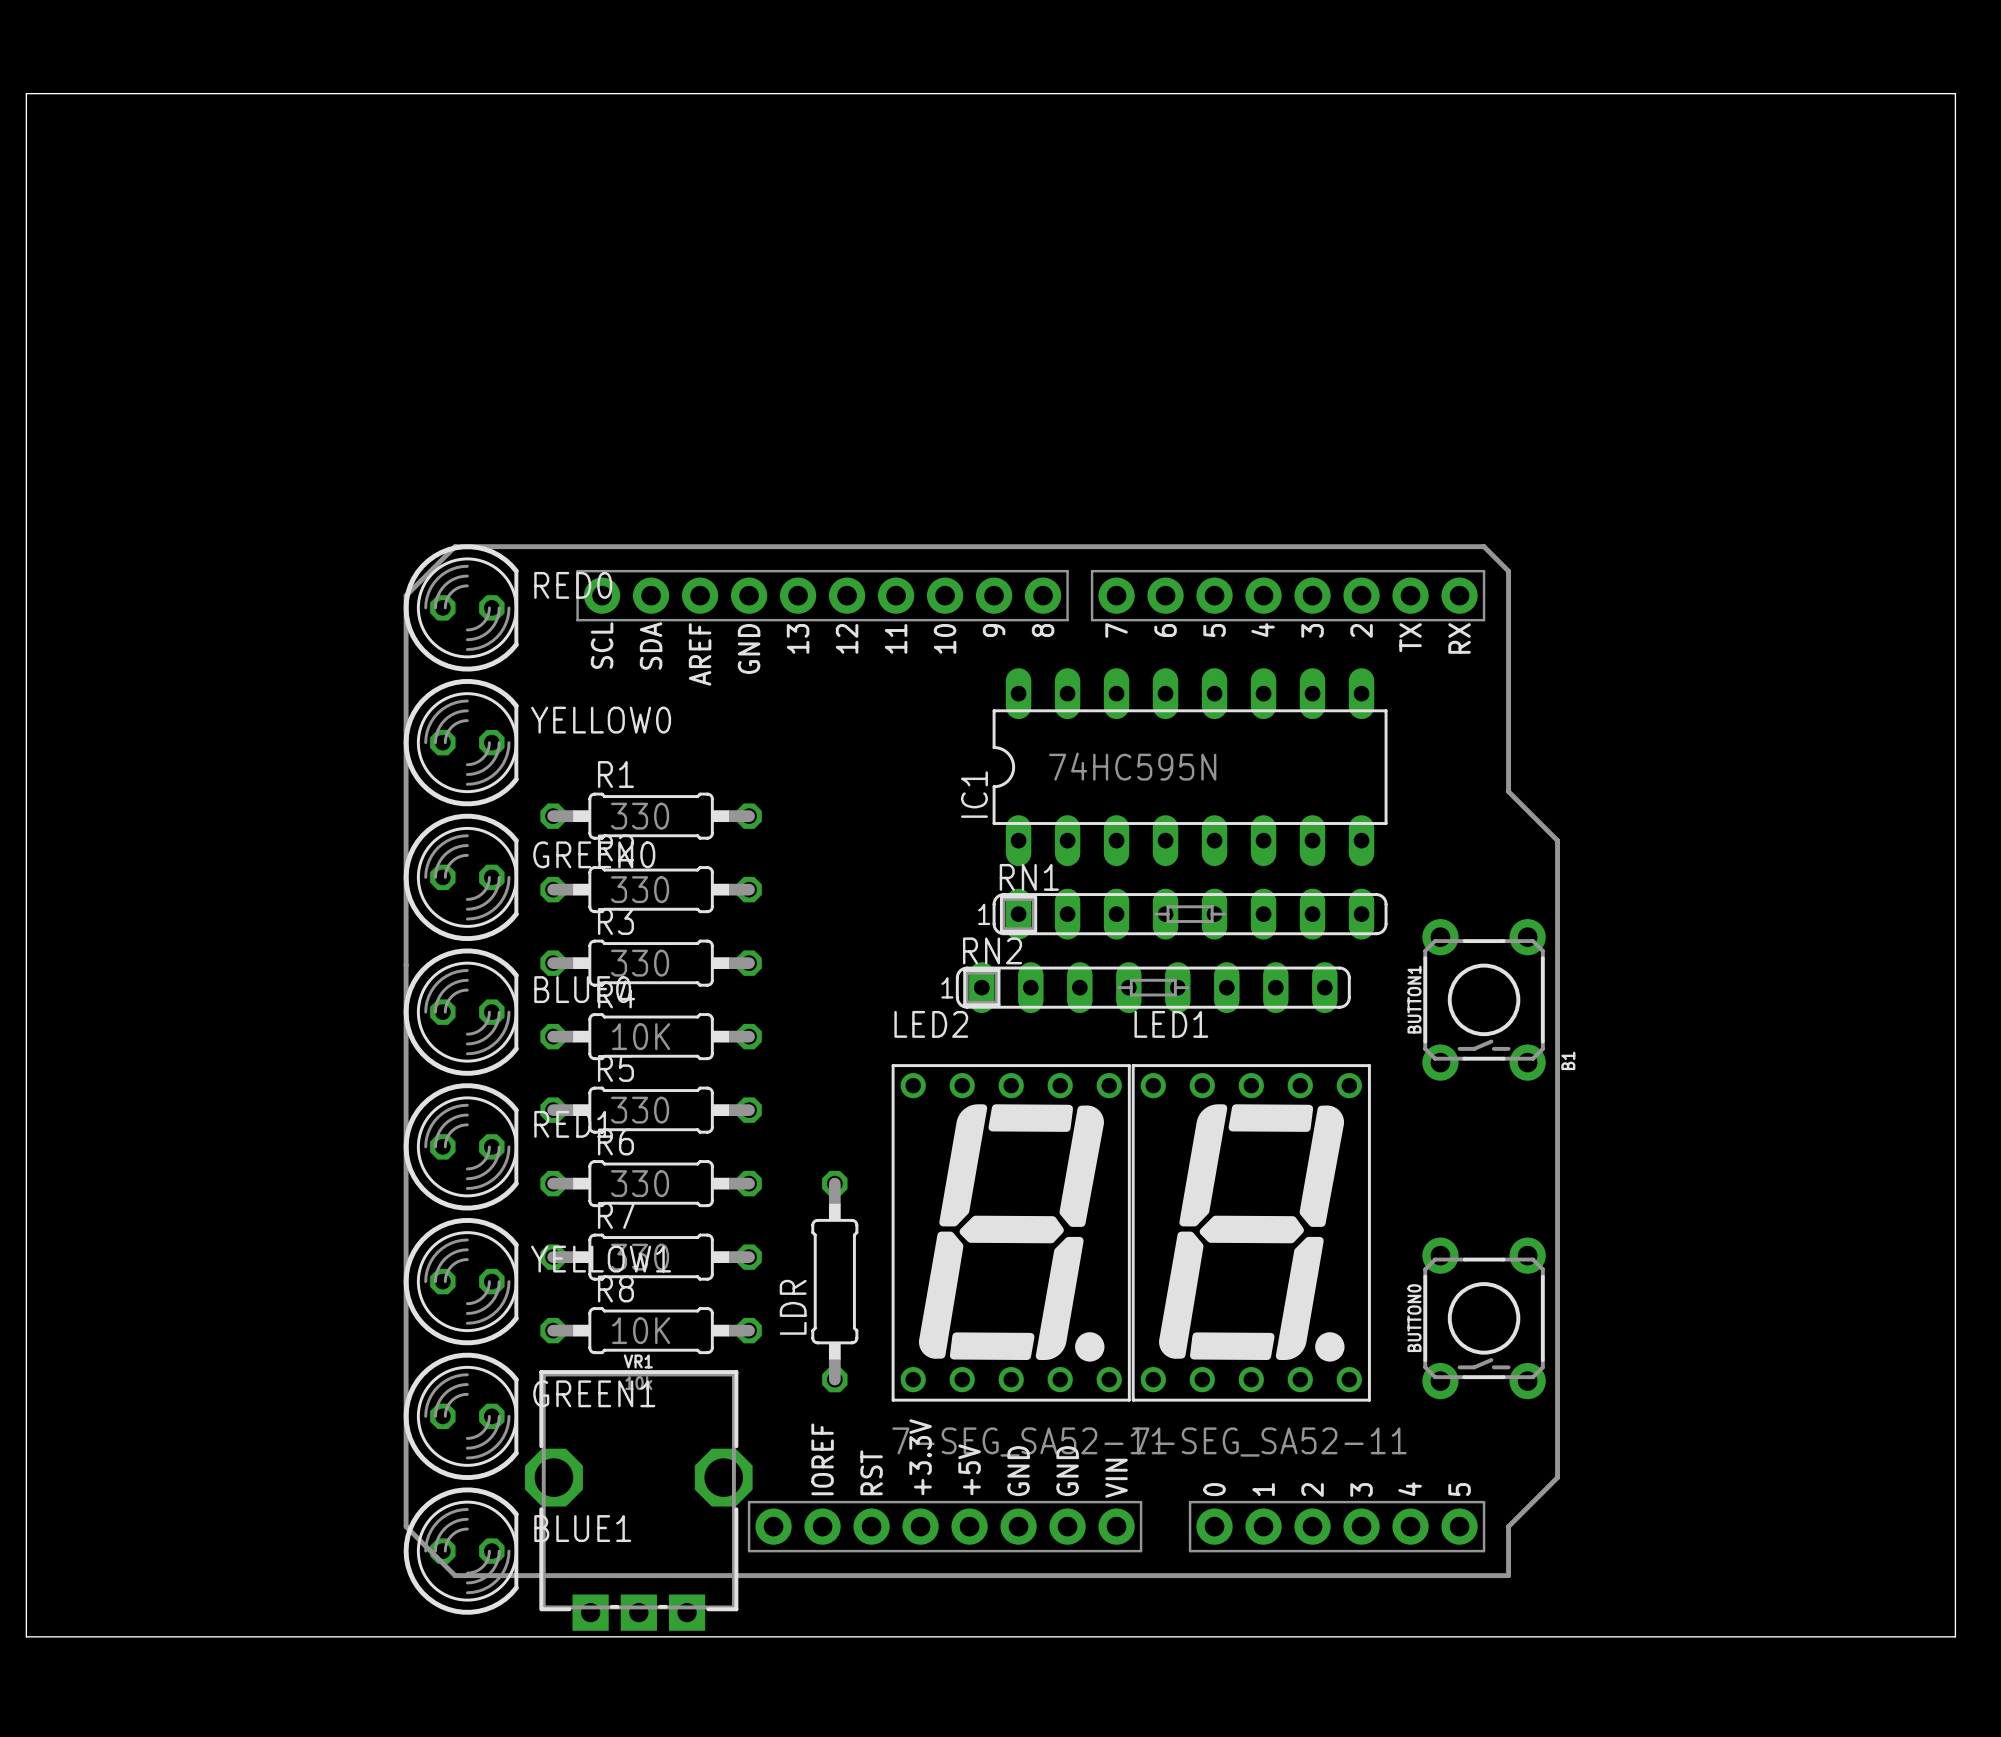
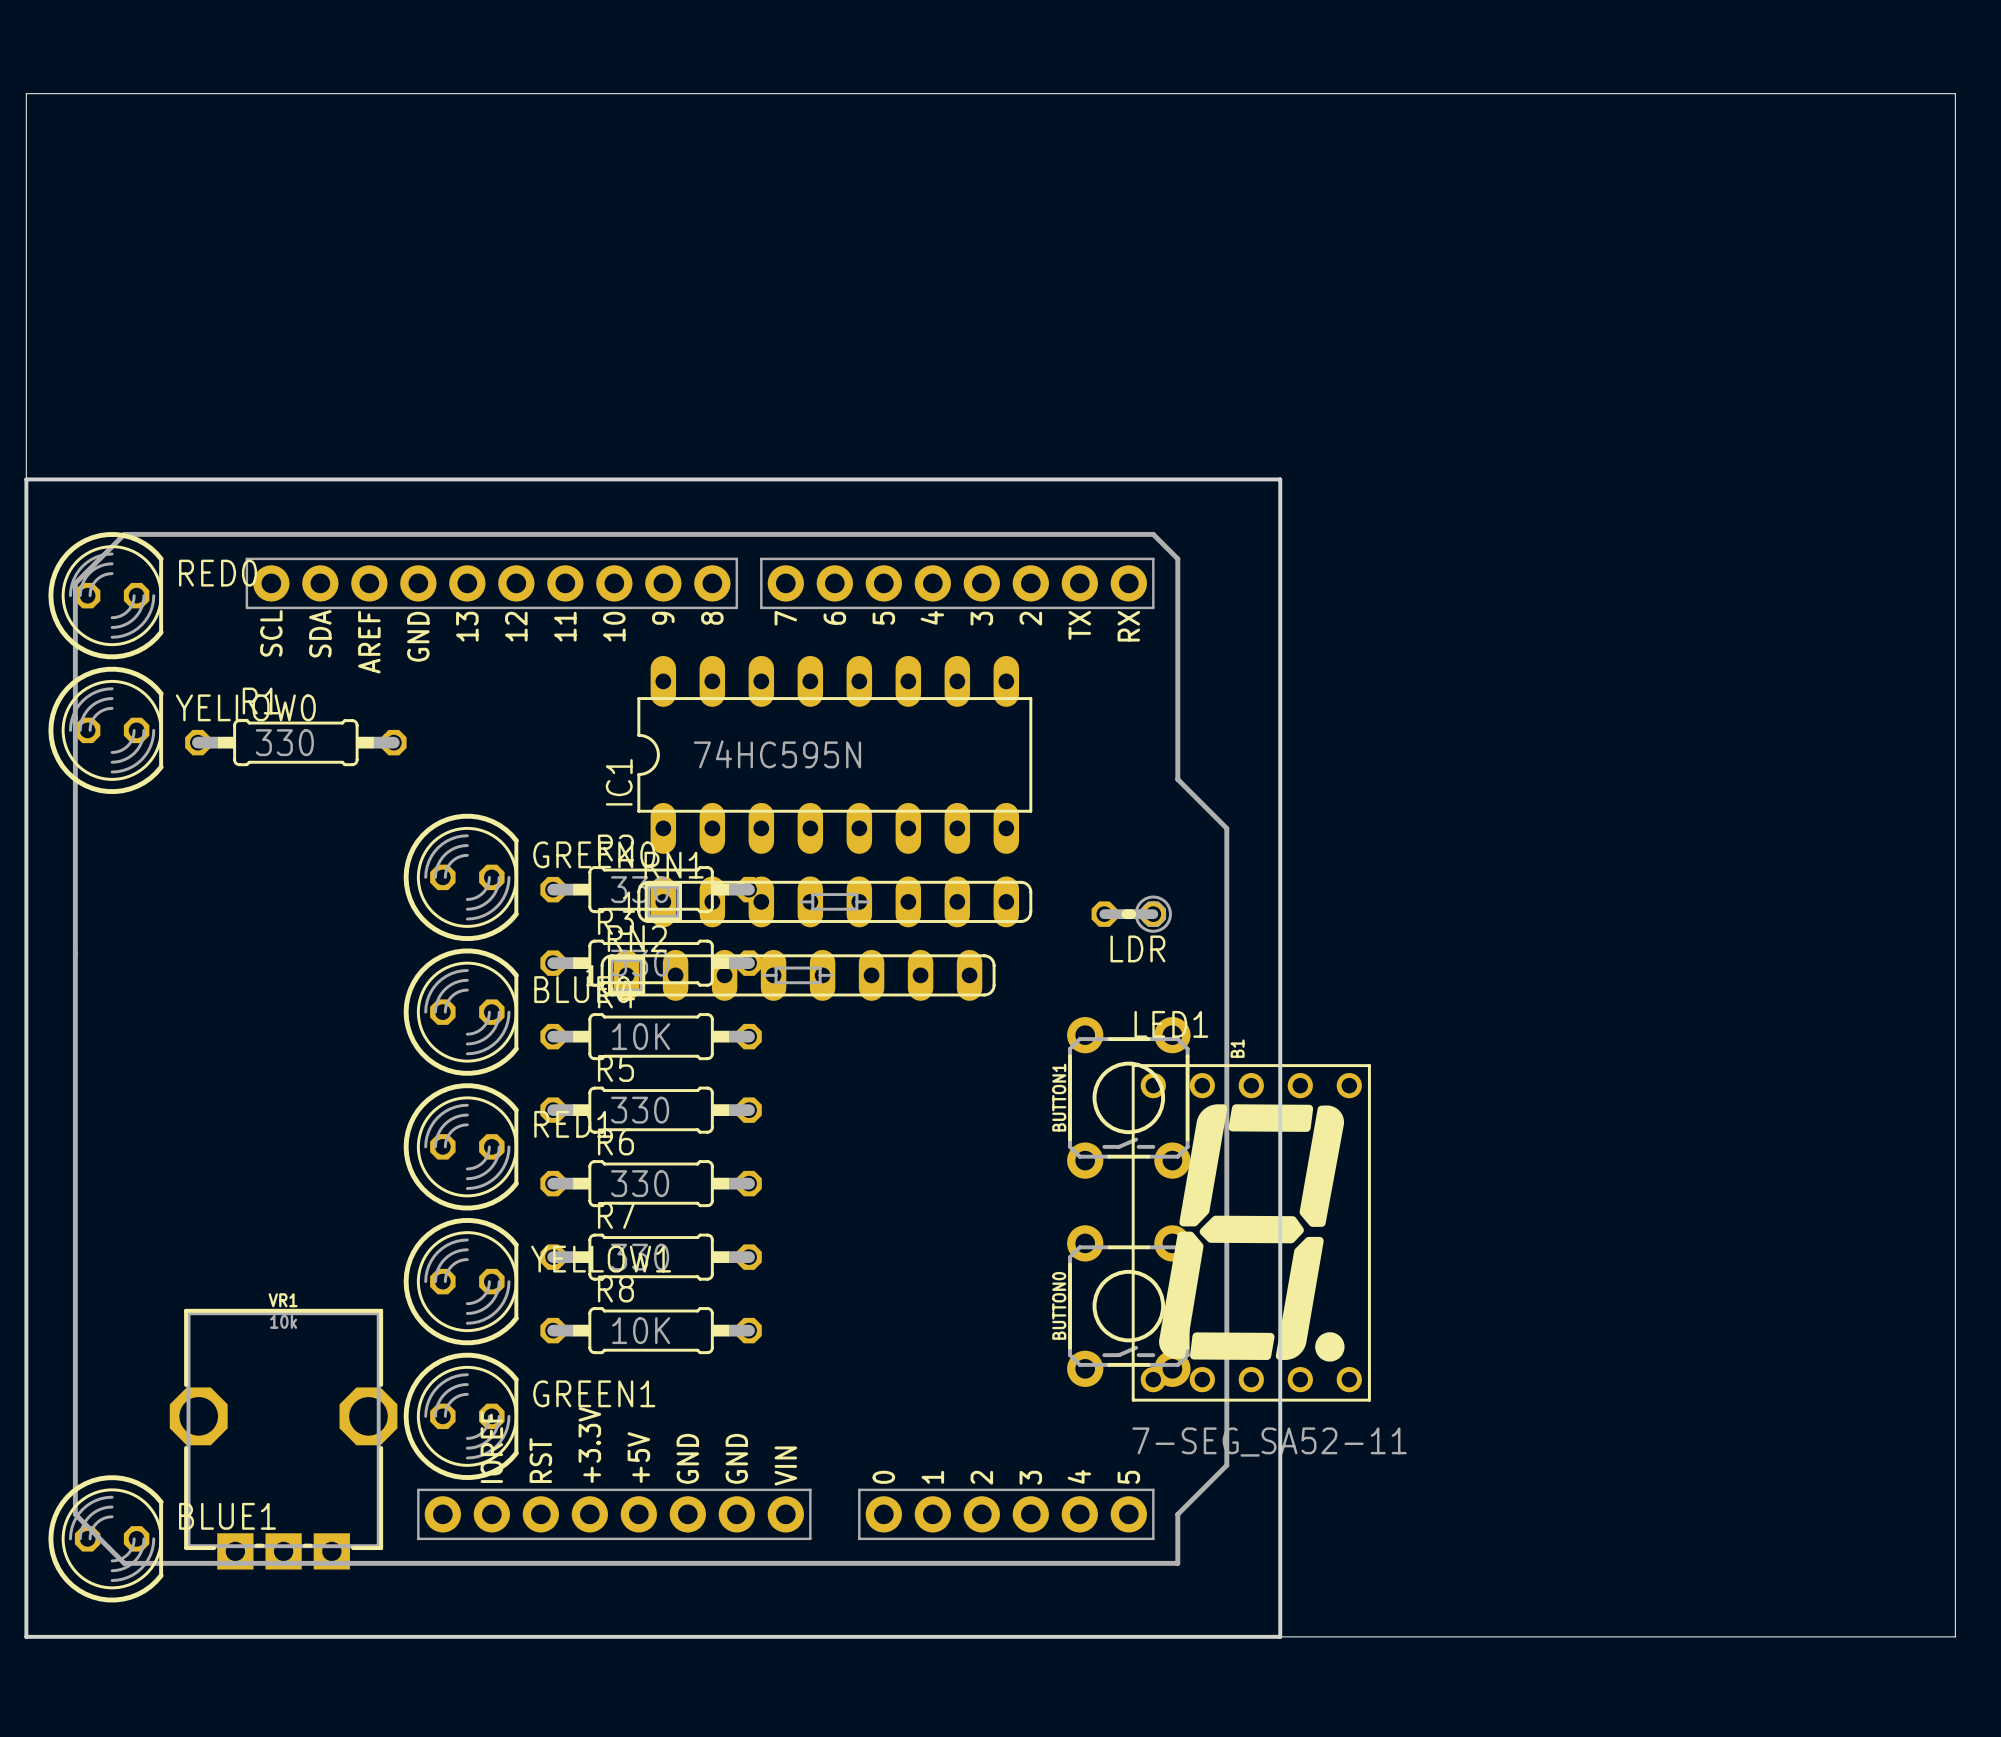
board edge: none -> (26, 479) (26, 1636) (1280, 1636) (1280, 479) (26, 479)
RED0 position: (461, 607) -> (105, 595)
YELLOW0 position: (461, 742) -> (105, 730)
IC1 position: (1190, 767) -> (834, 754)
R1 position: (651, 816) -> (295, 742)
LDR: none -> (1131, 914)
RN1 position: (1190, 914) -> (834, 901)
RN2 position: (1153, 987) -> (798, 975)
BUTTON1 position: (1484, 999) -> (1128, 1097)
B1 position: (981, 1061) -> (651, 1048)
LED2: 7-SEG_SA52-11 (1011, 1232) -> none
LDR: (834, 1281) -> none
BUTTON0 position: (1484, 1318) -> (1128, 1306)
VR1 position: (638, 1500) -> (283, 1439)
BLUE1 position: (461, 1551) -> (105, 1538)

